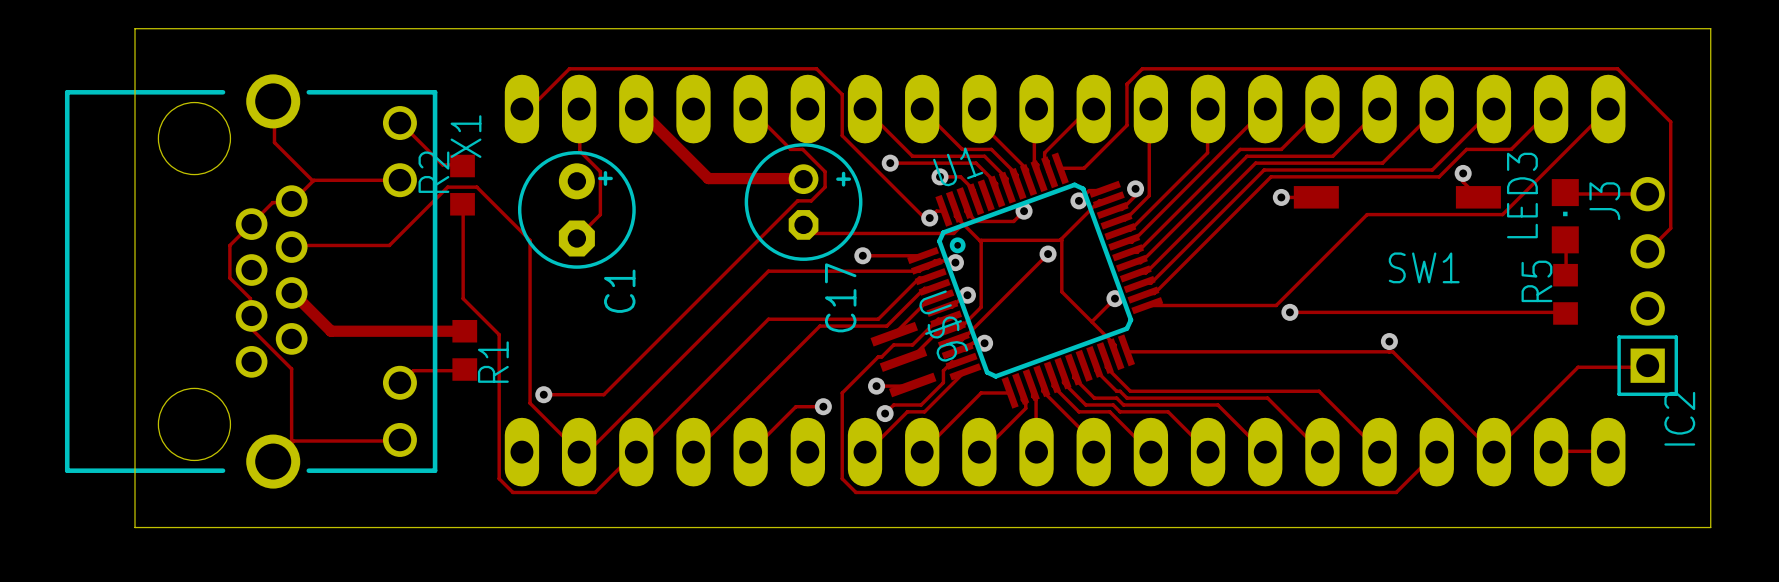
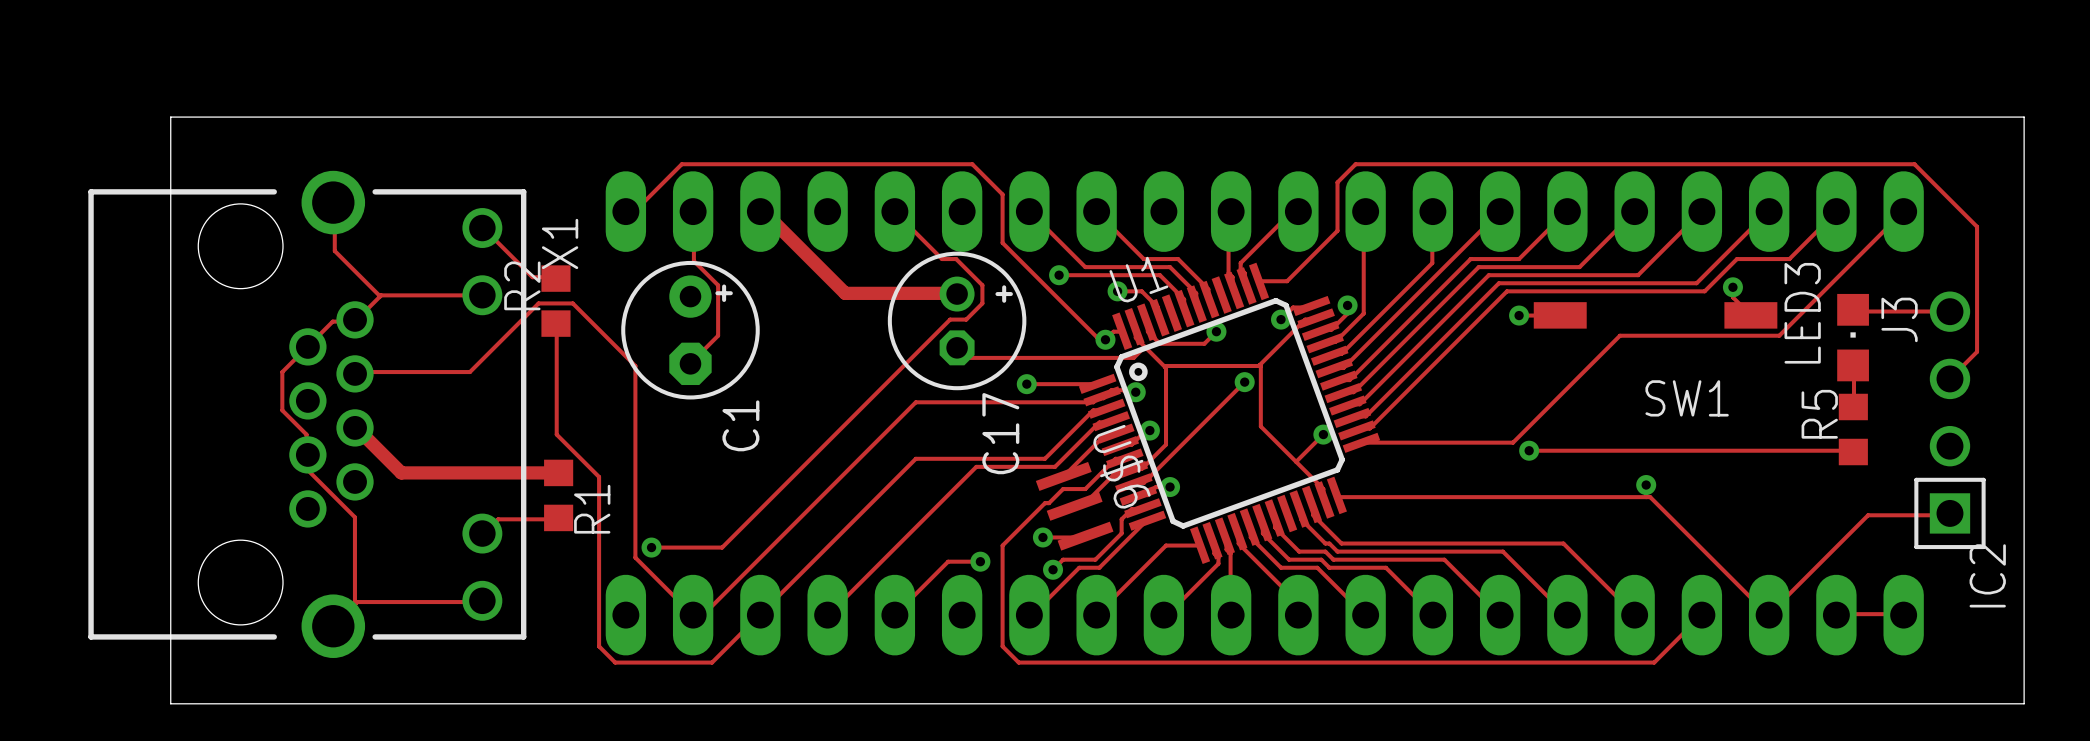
track: (979, 109) (979, 121) (1027, 170) (1028, 180) -> none

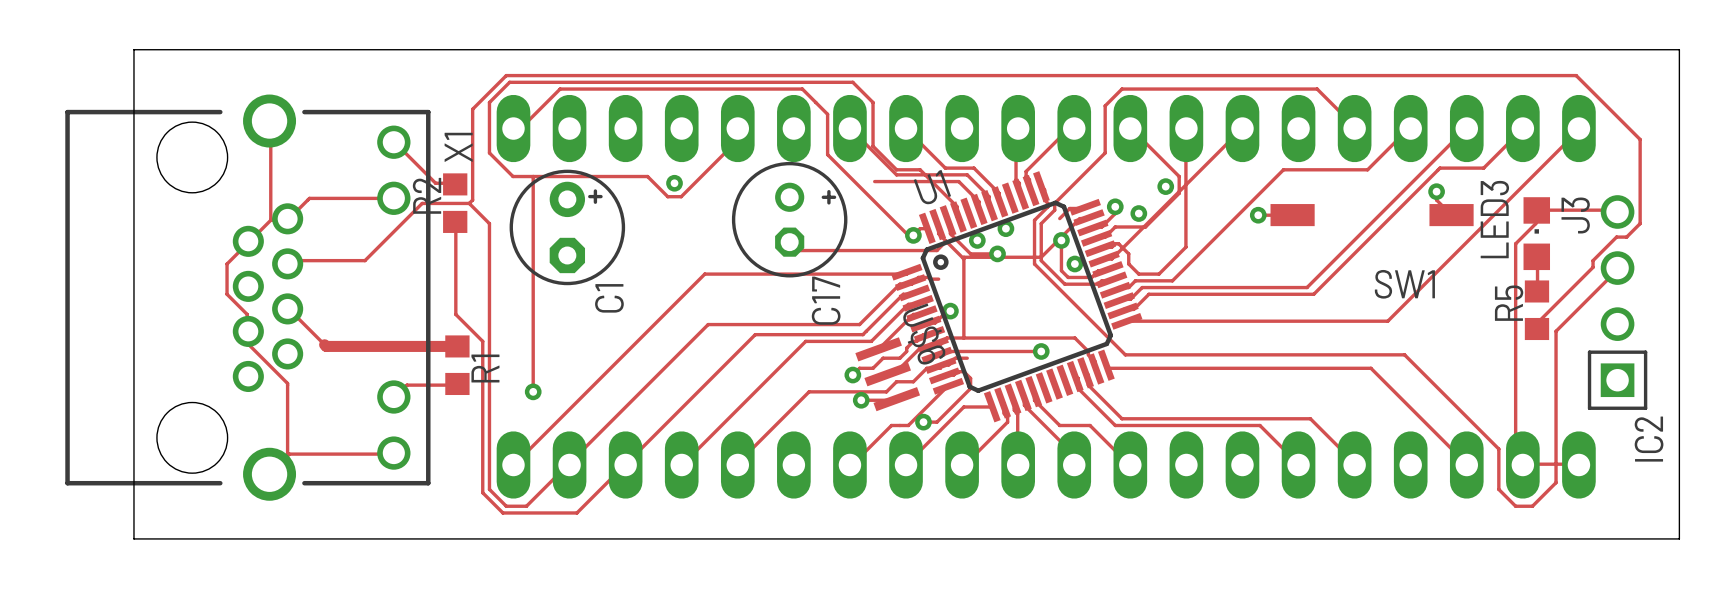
track: (1589, 164) (1914, 164) (1977, 226) -> (469, 203) (472, 200) (472, 109) (506, 75) (1576, 75) (1640, 141)
track: (1337, 182) (1337, 230) (1287, 281) (1259, 281) -> (1106, 104) (1105, 105) (1105, 152) (1054, 203) (1054, 210) (1041, 223) (1041, 260) (1064, 284) (1098, 284) (1101, 280) (1111, 279)
track: (693, 211) (693, 261) (718, 285) (718, 335) (690, 363) -> none
track: (760, 211) (764, 212) (845, 293) (957, 294) -> none
track: (894, 211) (942, 259) (956, 259) (982, 285) (982, 303) (966, 319) (950, 319) (722, 547) (651, 547) -> none
track: (1365, 211) (1363, 212) (1363, 313) (1347, 329) -> (1130, 128) (1179, 176) (1179, 193) (1145, 226) (1115, 226)
track: (1567, 211) (1519, 259) (1470, 259) (1349, 380) (1338, 380) -> (1061, 240) (1061, 270) (1068, 277) (1091, 277) (1098, 270) (1107, 269)
track: (1634, 211) (1579, 267) (1478, 267) (1353, 392) (1343, 393) -> (1354, 128) (1317, 89)
track: (1701, 211) (1638, 275) (1488, 275) (1359, 404) (1347, 405) -> (1410, 128) (1367, 169) (1283, 169) (1172, 280) (1135, 280) (1128, 287) (1118, 287) (1115, 290)
track: (1903, 211) (1779, 335) (1619, 335) (1513, 442) -> (1578, 128) (1387, 321) (1253, 321)
track: (334, 250) (380, 296) -> none
track: (1432, 263) (1341, 353) -> (1185, 171) (1185, 247) (1159, 274) (1138, 274) (1128, 264) (1128, 253) (1118, 243) (1110, 247)
track: none -> (533, 176) (533, 391)
via: (1059, 275) -> none
via: none -> (674, 183)
track: none -> (1041, 186) (1044, 189) (1044, 200) (1047, 203) (1047, 206) (1034, 220) (1034, 264) (1125, 354) (1404, 354) (1498, 449) (1498, 489) (1515, 506) (1532, 506) (1556, 482) (1556, 331) (1617, 268)
via: none -> (1165, 186)
track: (1696, 283) (1498, 283) (1379, 402) -> (1406, 188) (1307, 287) (1142, 287)
track: (1117, 291) (1141, 291) (1157, 307) -> (737, 128) (735, 129) (735, 142) (681, 196) (667, 196) (647, 176) (513, 176) (489, 152) (489, 102) (509, 82) (852, 82) (873, 102) (873, 146) (896, 169) (920, 169) (957, 208)
via: (1117, 291) -> none
track: (1704, 291) (1506, 291) (1387, 410) -> (1413, 195) (1313, 294) (1148, 294)
track: none -> (469, 203) (422, 203) (364, 260) (290, 260) (287, 263)
track: none -> (469, 203) (489, 223) (489, 489) (491, 491)
track: (1853, 309) (1853, 311) (1949, 311) -> (1522, 464) (1515, 455) (1515, 243) (1535, 223) (1536, 210) (1616, 210) (1617, 211)
via: none -> (1138, 213)
via: (1281, 319) -> none
track: (334, 321) (282, 374) -> (270, 161) (270, 220) (227, 264)
track: (1147, 322) (1147, 331) (1159, 343) (1204, 343) (1216, 331) -> (948, 220) (950, 223) (950, 233) (970, 253) (997, 253)
track: (1977, 325) (1977, 351) (1949, 378) -> (1640, 223) (1626, 237) (1616, 237) (1593, 260) (1593, 267) (1539, 321) (1539, 327) (1536, 329)
via: none -> (977, 240)
via: none -> (1061, 240)
via: none -> (997, 253)
track: (1259, 364) (1260, 426) (1323, 491) -> (933, 344) (940, 344) (947, 338) (1074, 338) (1095, 361)
track: (355, 373) (356, 372) (469, 372) (538, 303) (572, 303) (635, 365) (635, 557) (693, 615) (704, 614) (915, 402) (1093, 402) (1097, 398) -> (504, 504) (506, 506) (526, 506) (708, 324) (859, 324) (899, 284) (906, 284)
via: none -> (1074, 264)
track: (1244, 382) (1141, 483) -> (1041, 351) (947, 351) (943, 354)
via: (1244, 382) -> none
track: (1026, 384) (1097, 384) -> (513, 464) (704, 274) (906, 274) (906, 272)
via: (1026, 384) -> none
via: (1135, 392) -> none
track width: thick (359, 430) (399, 470) -> thin (290, 311) (324, 344)
track: (1323, 434) (1296, 461) -> none
via: (1323, 434) -> none
track: (1166, 444) (1141, 468) (1131, 468) (1129, 470) -> (963, 322) (963, 338)
track: (1529, 450) (1853, 452) -> none
via: (1529, 450) -> none
track: (1117, 458) (1085, 489) (1063, 489) (1049, 503) (1044, 503) (1002, 545) (1002, 646) (1018, 662) (1654, 662) (1701, 615) -> (923, 334) (906, 348) (906, 351) (899, 358) (883, 358) (873, 368) (859, 368) (852, 375)
track: (589, 466) (599, 476) (599, 646) -> (482, 341) (482, 492) (502, 512) (576, 512) (585, 504)
via: none -> (1041, 351)
via: (1646, 485) -> none
via: (1170, 487) -> none
track: (1336, 495) (1337, 497) (1650, 497) (1769, 615) (1868, 515) (1948, 515) (1949, 513) -> (1106, 365) (1108, 368) (1370, 368) (1466, 464)
track: (1312, 504) (1313, 515) (1341, 543) (1563, 543) (1634, 615) -> none
via: none -> (852, 375)
track: (1142, 508) (1131, 509) (1121, 519) (1121, 533) (1095, 559) (1063, 559) (1053, 569) -> (944, 375) (963, 371) (970, 378) (970, 388) (936, 422) (923, 422)
track: (1299, 509) (1301, 509) (1301, 519) (1325, 543) (1329, 543) (1337, 551) (1502, 551) (1567, 615) -> (1147, 425) (1259, 425) (1298, 464)
track: (1274, 518) (1274, 527) (1299, 551) (1325, 551) (1333, 559) (1355, 559) -> (1085, 372) (1088, 375) (1088, 385) (1122, 418)
track: (1262, 522) (1262, 533) (1289, 559) (1321, 559) (1329, 567) (1347, 567) -> (1075, 376) (1078, 378) (1078, 388) (1115, 425)
via position: (651, 547) -> (533, 391)
track: (1444, 559) (1500, 615) -> (1196, 418) (1310, 418) (1354, 464)
track: (980, 561) (948, 561) (894, 615) -> (940, 365) (940, 368) (926, 368) (913, 381) (896, 381) (886, 391) (809, 391) (737, 464)
via: (980, 561) -> none
via: none -> (923, 422)
track: (1385, 567) (1432, 615) -> none
via: (1053, 569) -> none
track: (615, 662) (712, 662) -> none

